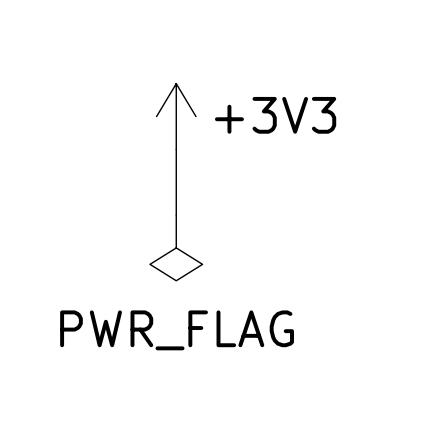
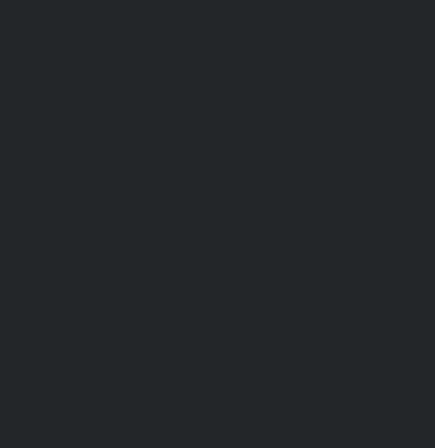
power symbol: +3V3 (176, 116) -> none
wire: (176, 149) (176, 215) -> none
power symbol: PWR_FLAG (176, 247) -> none

